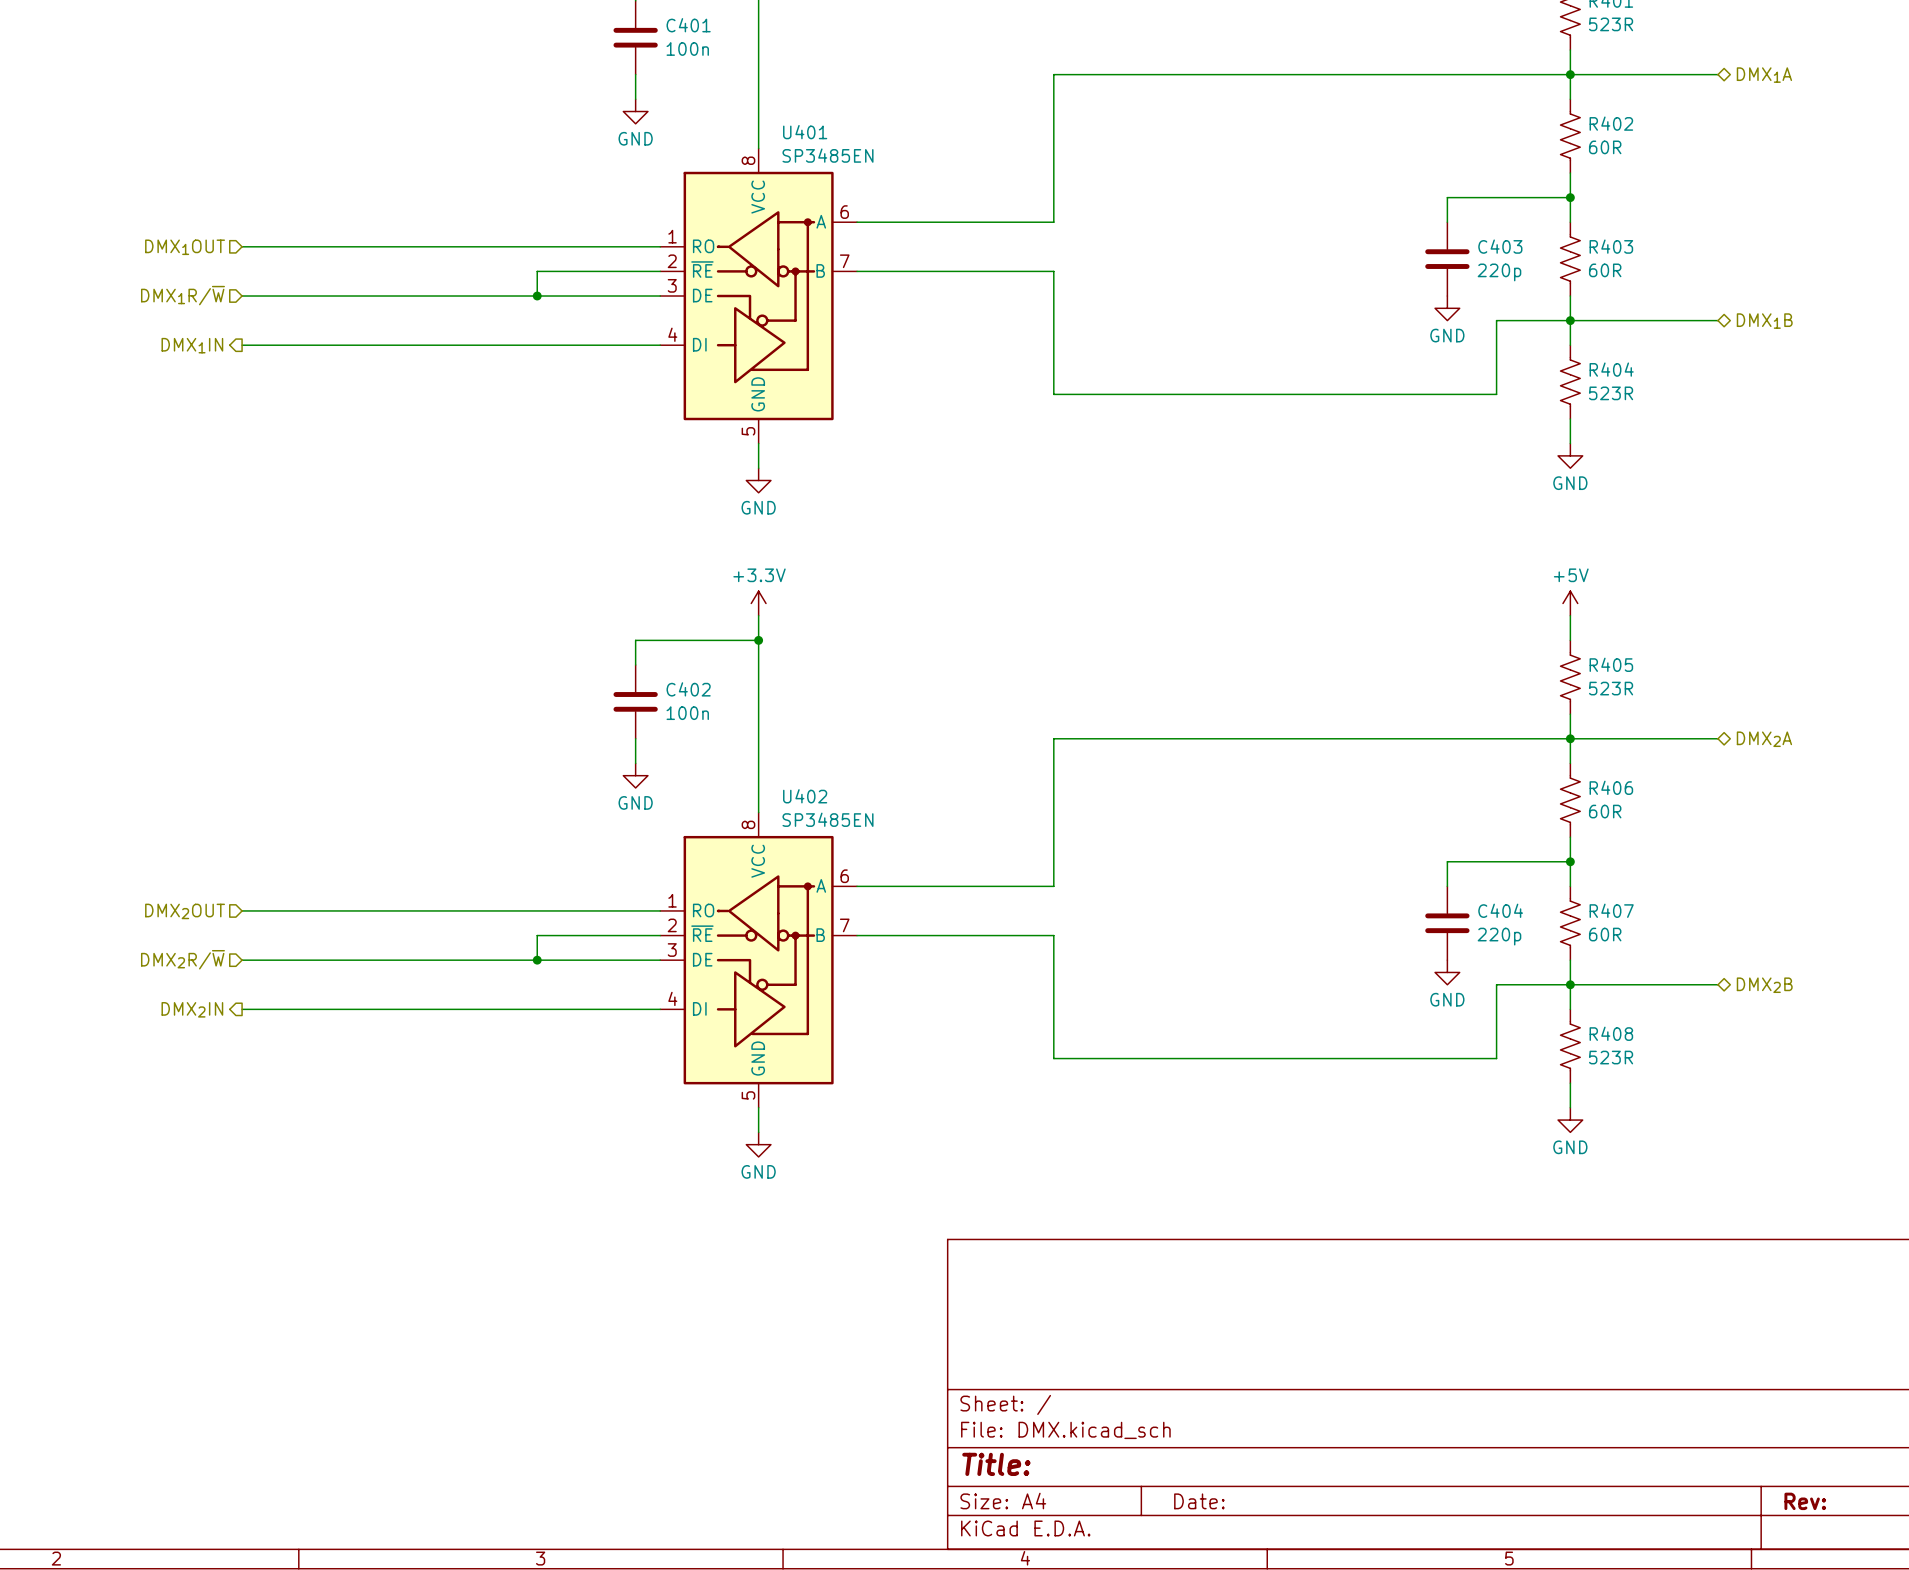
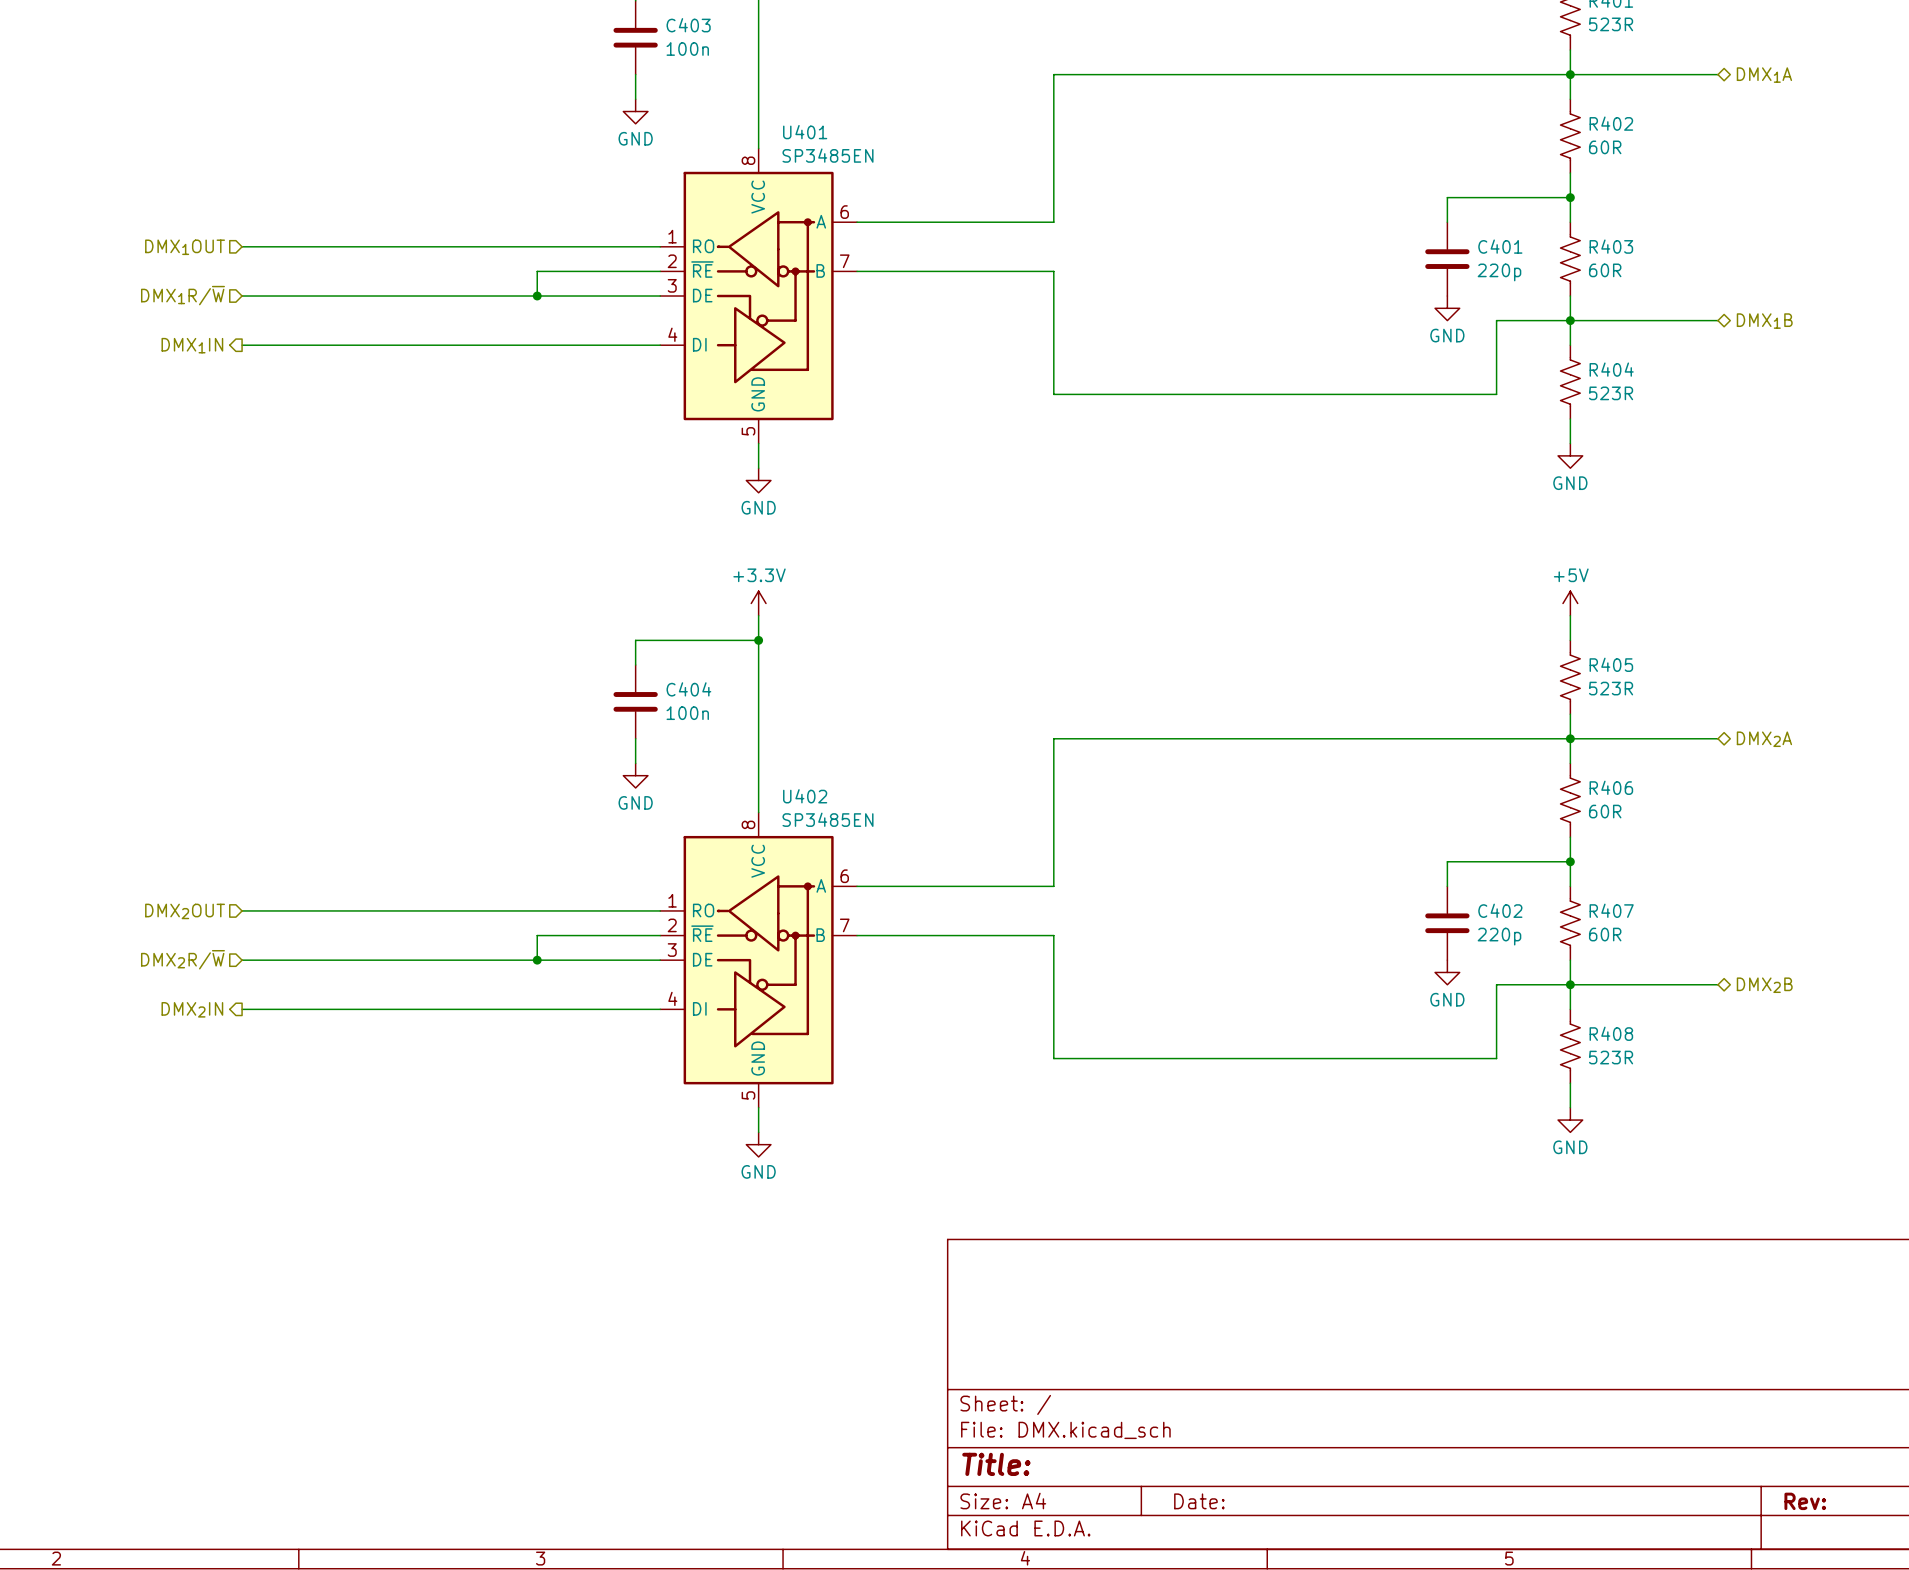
C401 name: C401 (688, 25) -> C403 (688, 25)
C403 name: C403 (1500, 246) -> C401 (1500, 246)
C402 name: C402 (688, 689) -> C404 (688, 689)
C404 name: C404 (1500, 910) -> C402 (1500, 910)

